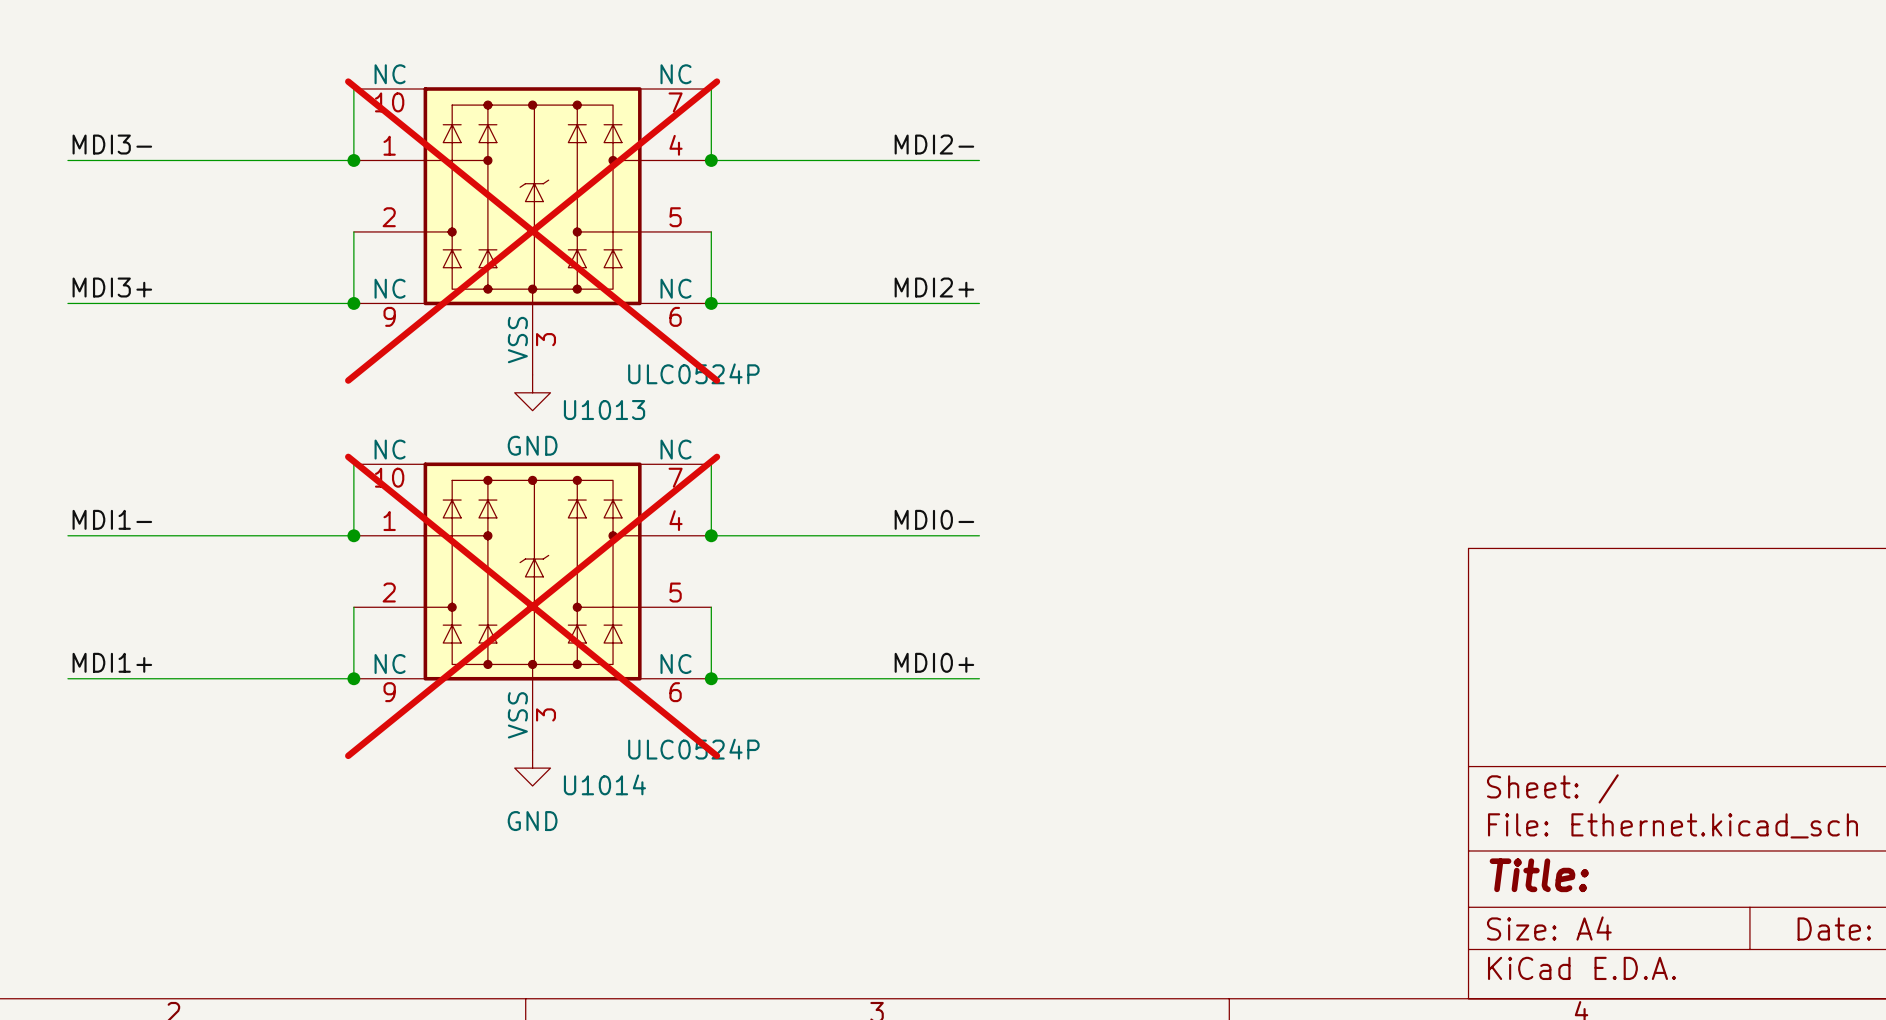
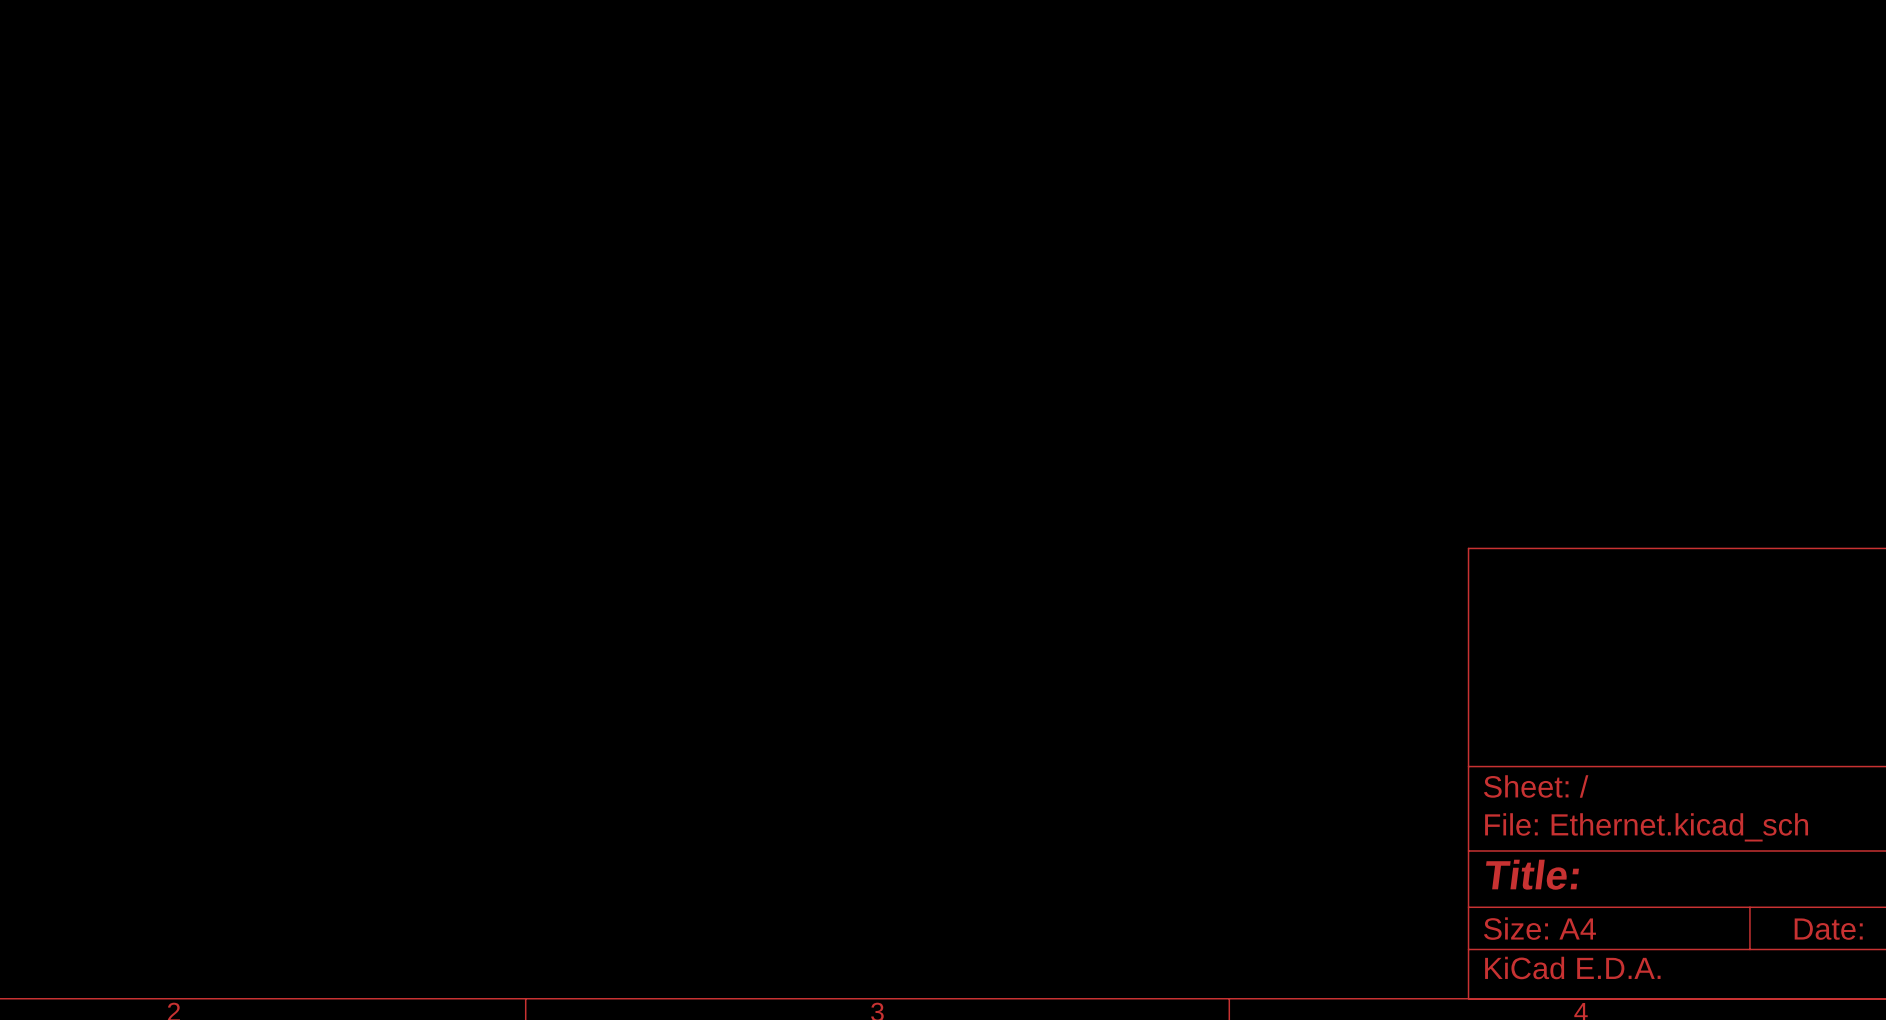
wire: (353, 89) (353, 160) (67, 160) -> none
wire: (711, 89) (711, 160) (979, 160) -> none
label: MDI3- (112, 144) -> none
label: MDI2- (934, 144) -> none
junction: (353, 160) -> none
junction: (711, 160) -> none
wire: (353, 231) (353, 303) (67, 303) -> none
U1013: ULC0524P (532, 231) -> none
wire: (711, 231) (711, 303) (979, 303) -> none
label: MDI3+ (112, 287) -> none
label: MDI2+ (934, 287) -> none
junction: (353, 303) -> none
junction: (711, 303) -> none
power symbol: GND (532, 392) -> none
wire: (353, 464) (353, 535) (67, 535) -> none
wire: (711, 464) (711, 535) (979, 535) -> none
label: MDI1- (112, 519) -> none
label: MDI0- (934, 519) -> none
junction: (353, 535) -> none
junction: (711, 535) -> none
U1014: ULC0524P (532, 606) -> none
wire: (353, 607) (353, 678) (67, 678) -> none
wire: (711, 607) (711, 678) (979, 678) -> none
label: MDI1+ (112, 662) -> none
label: MDI0+ (934, 662) -> none
junction: (353, 678) -> none
junction: (711, 678) -> none
power symbol: GND (532, 768) -> none

